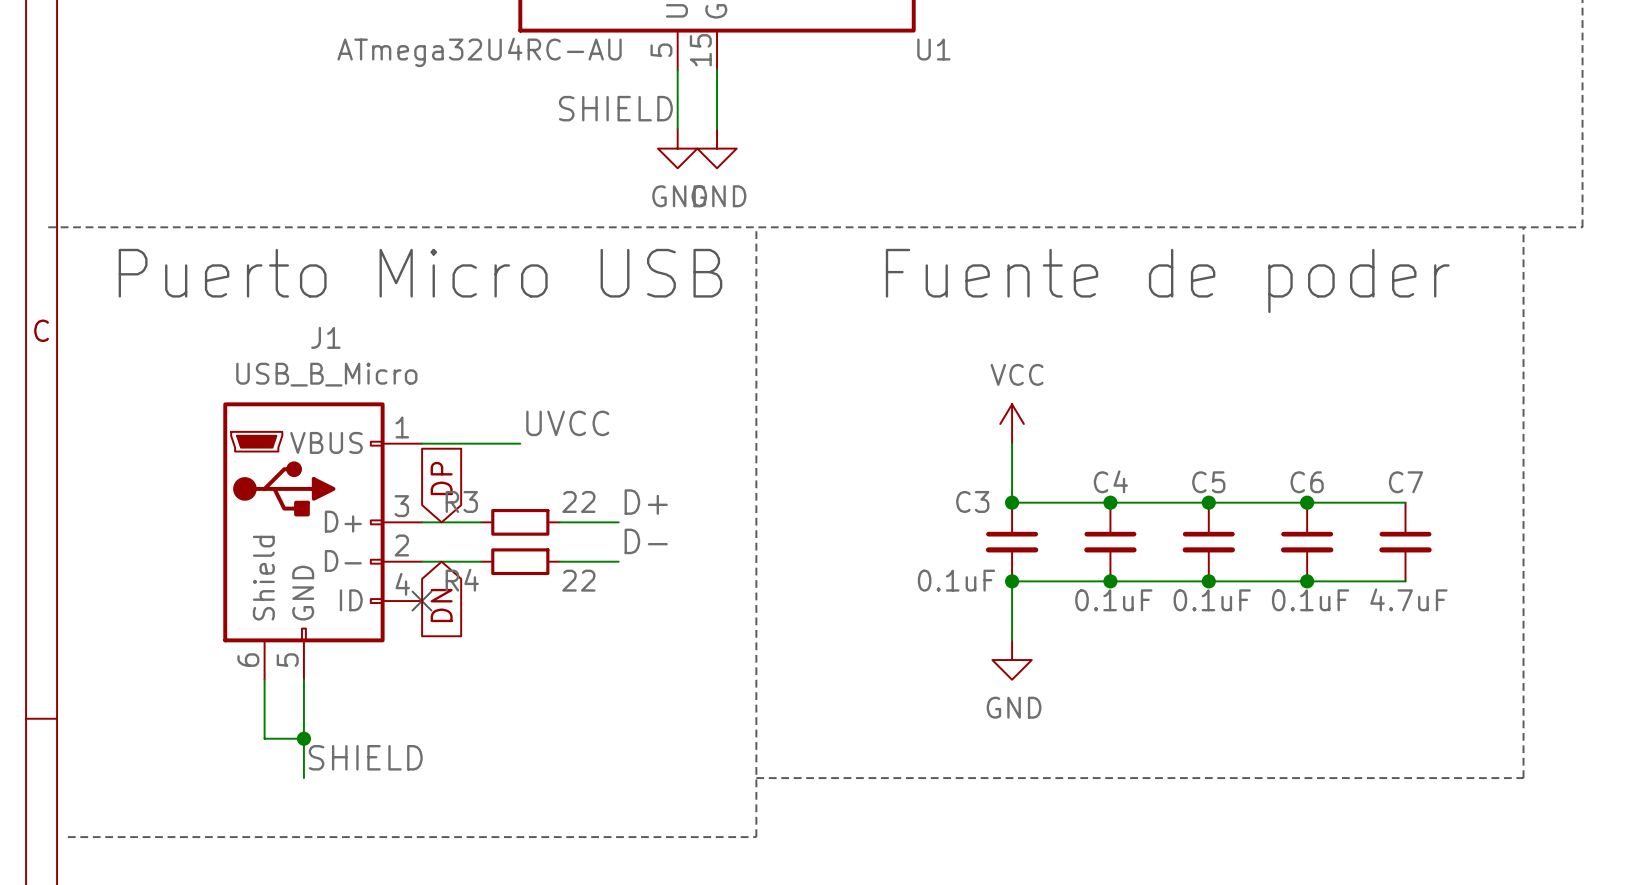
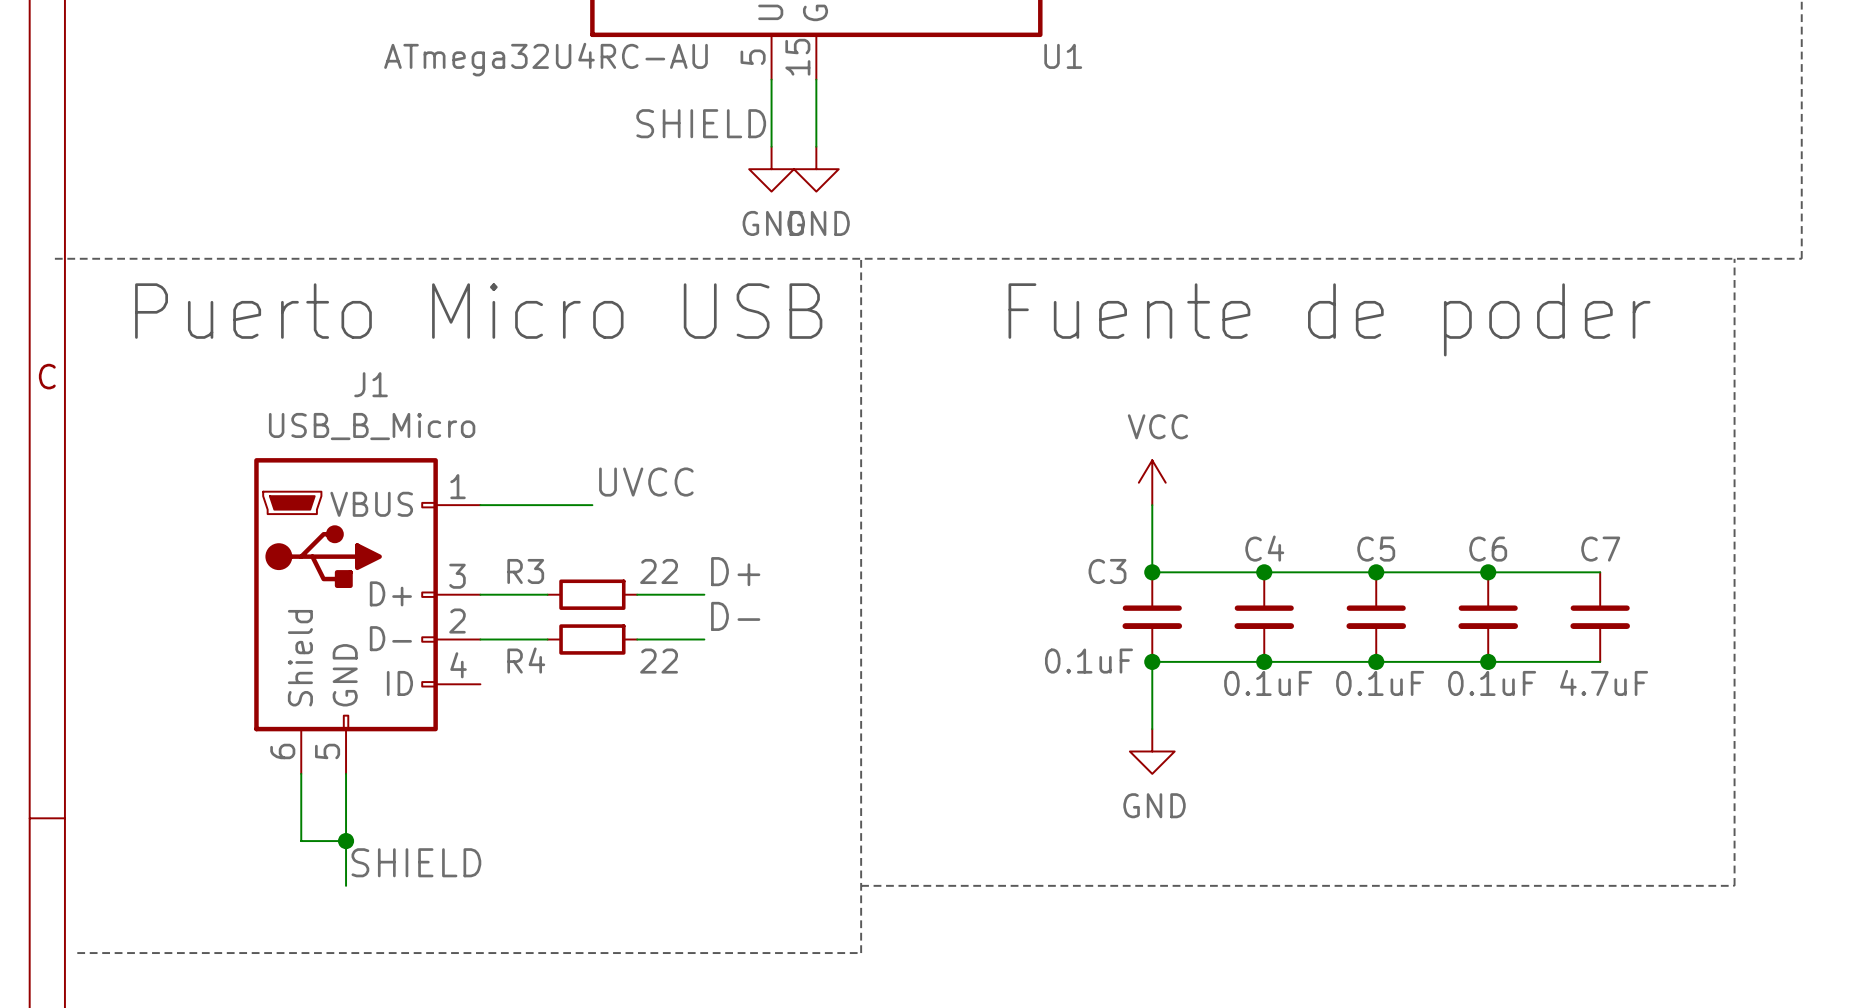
global label: DP (441, 478) -> none
no-connect mark: (421, 601) -> none
global label: DN (441, 605) -> none

